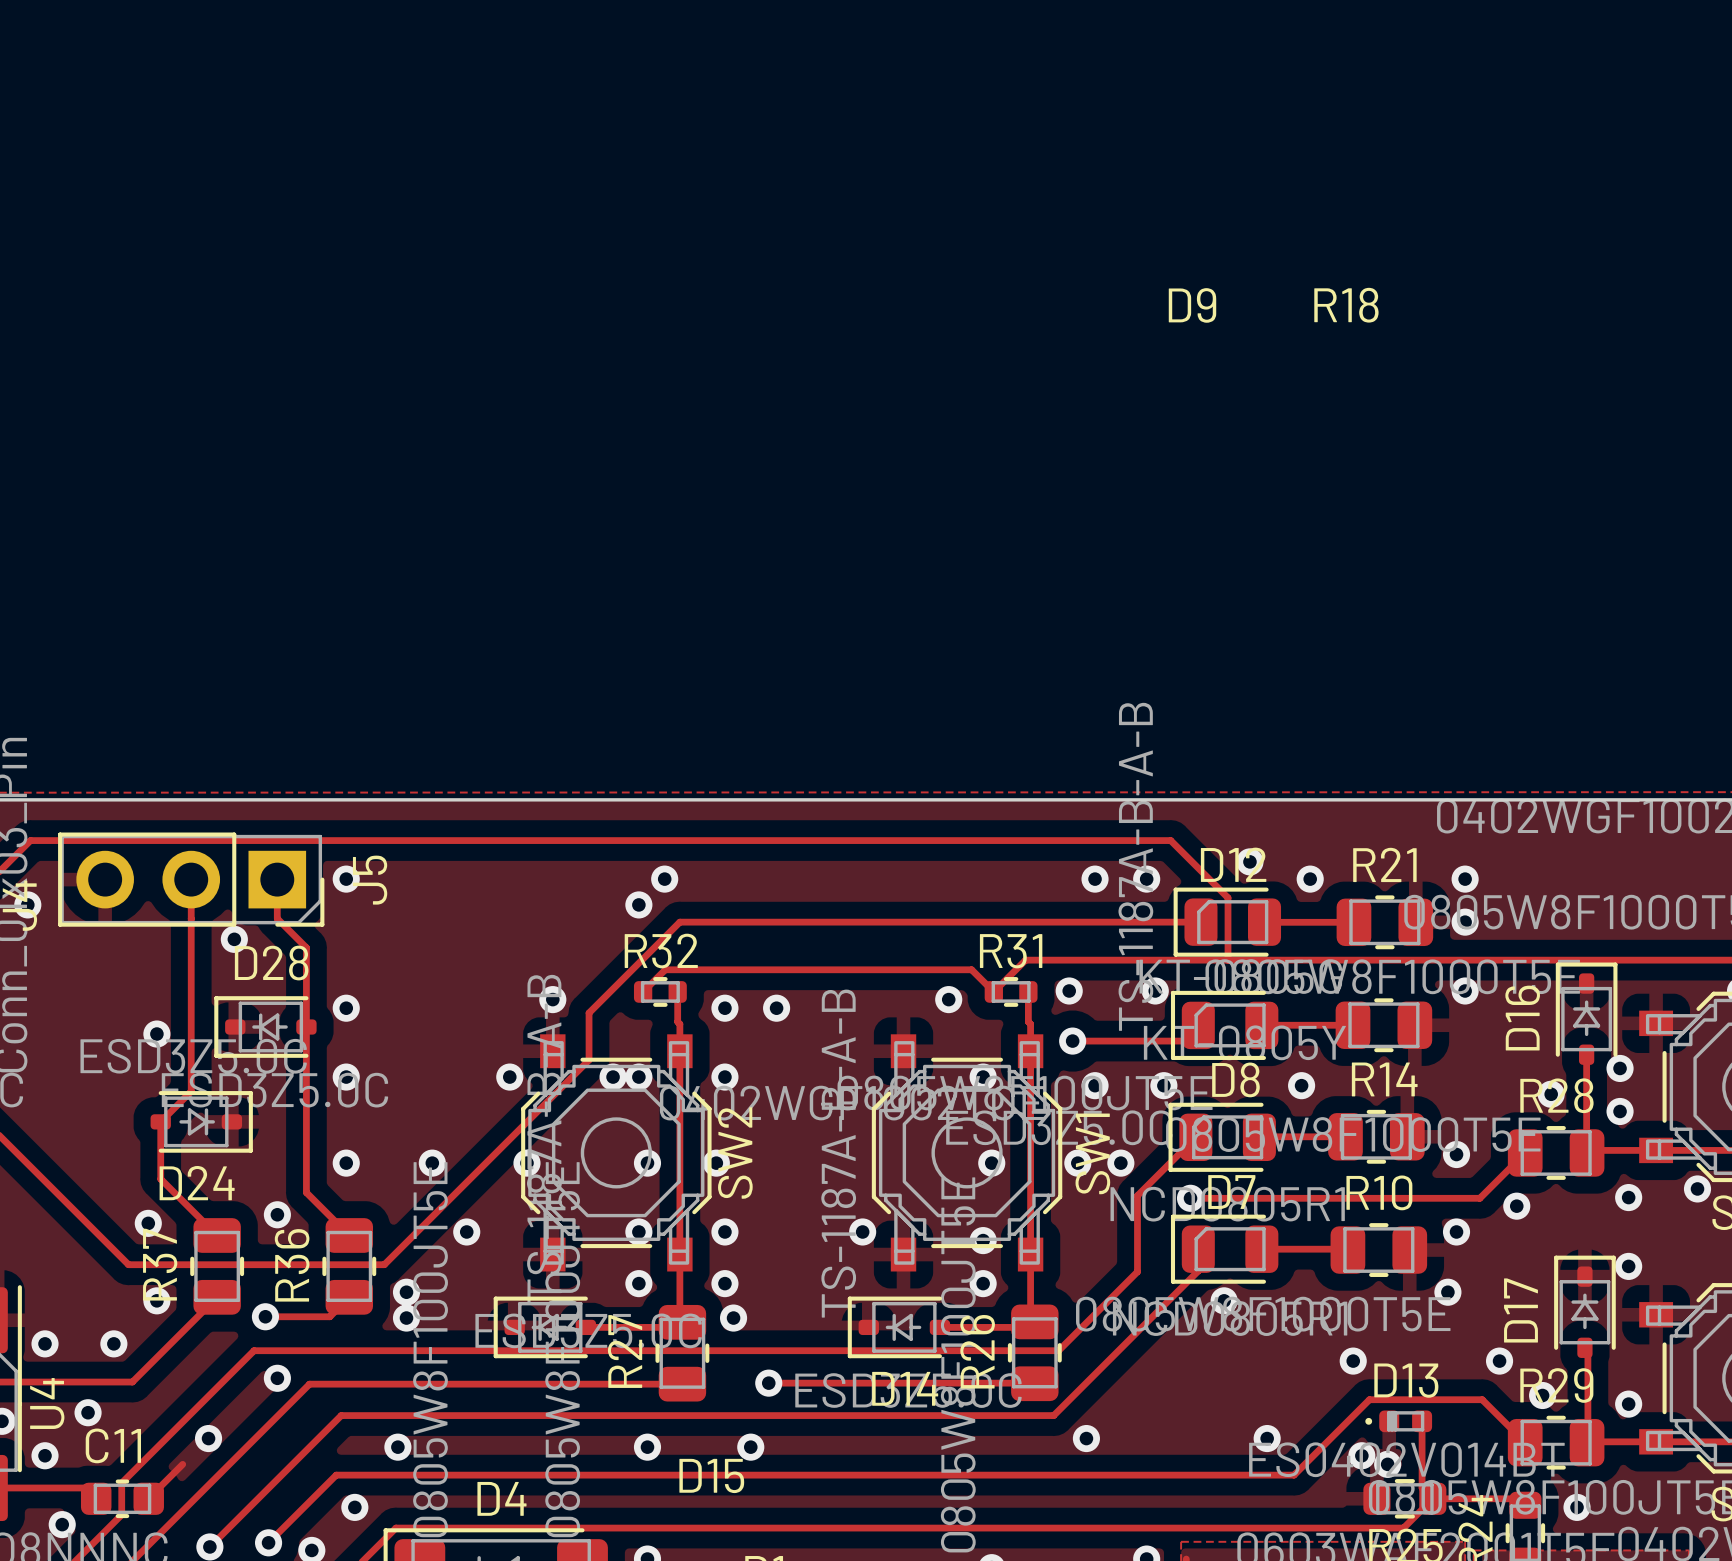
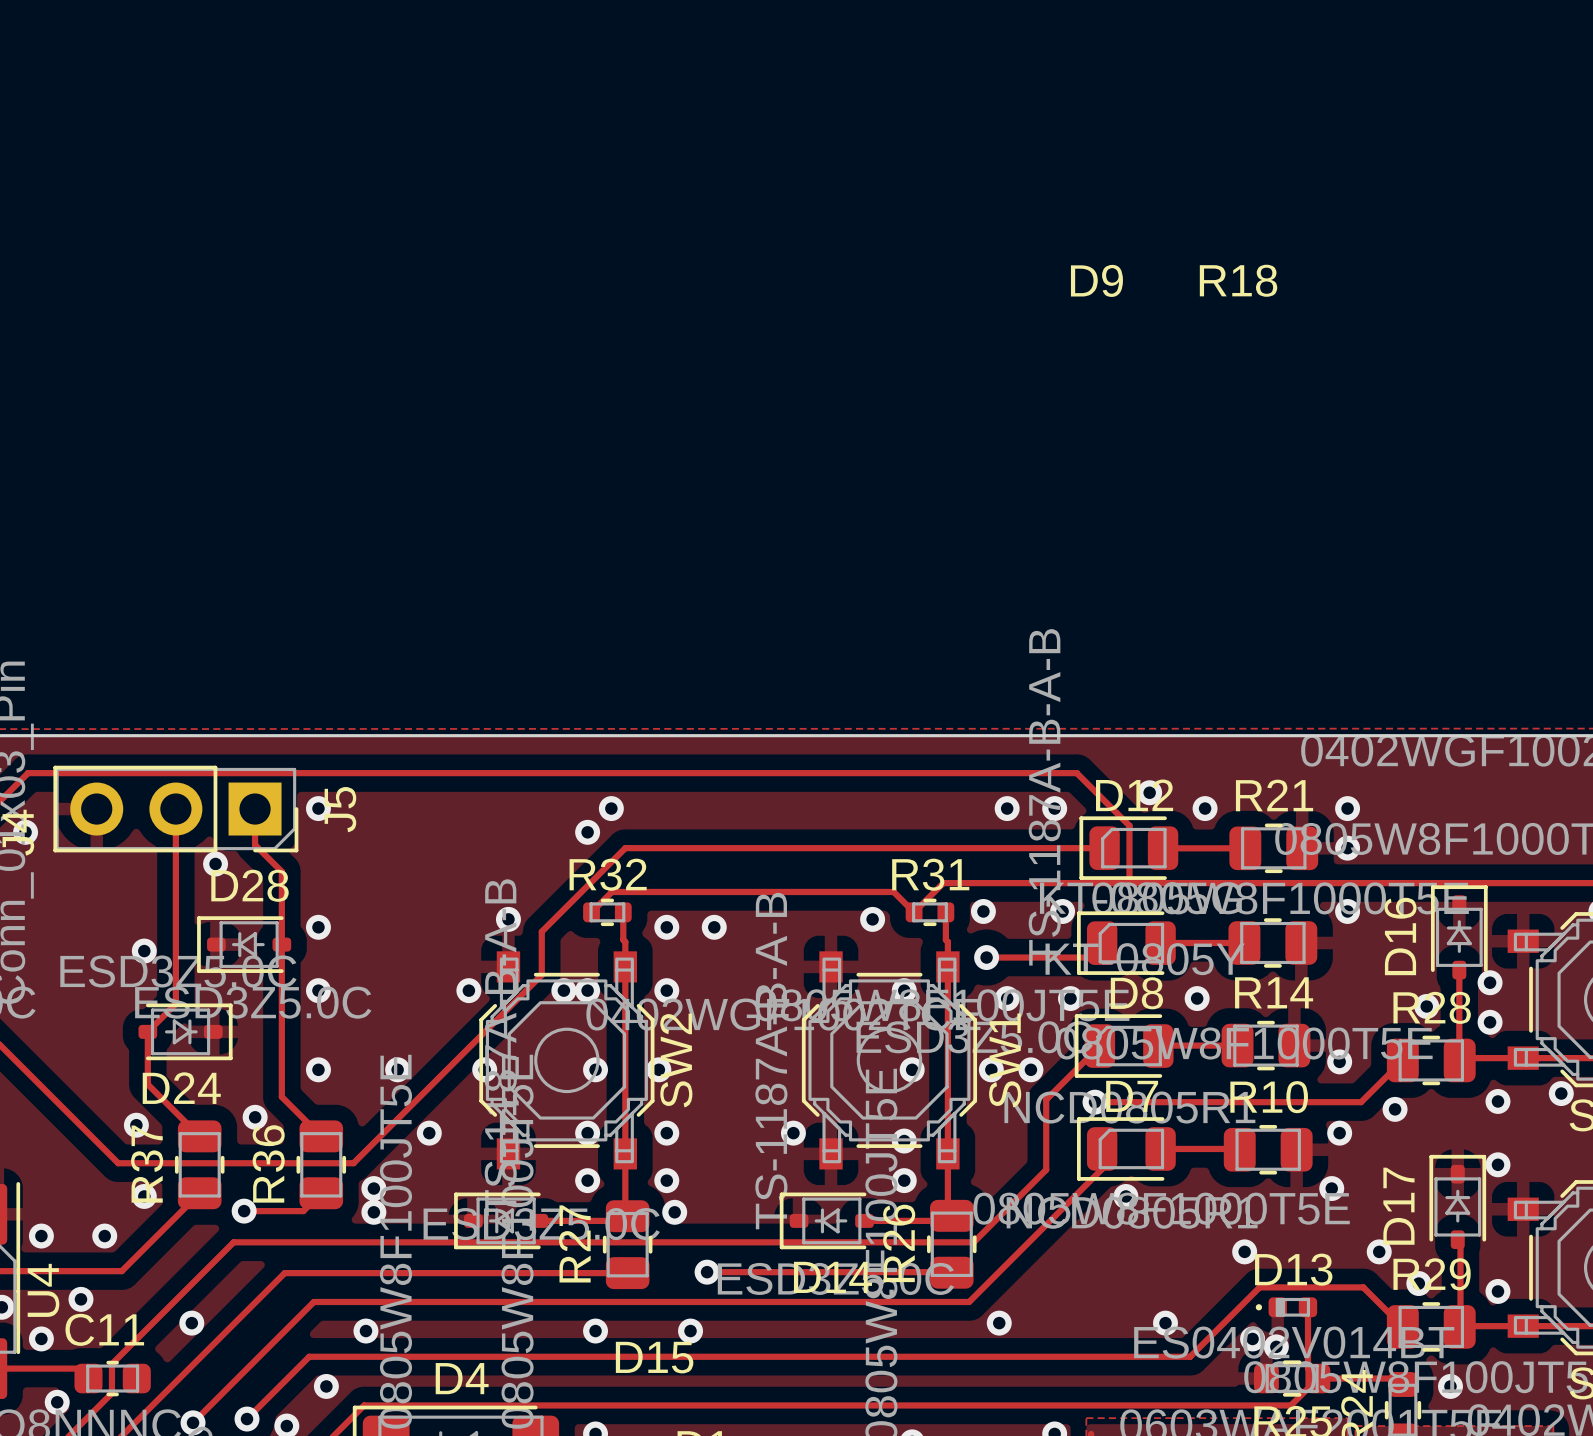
via: (277, 1378) -> none
track: (182, 1464) (148, 1498) -> none

